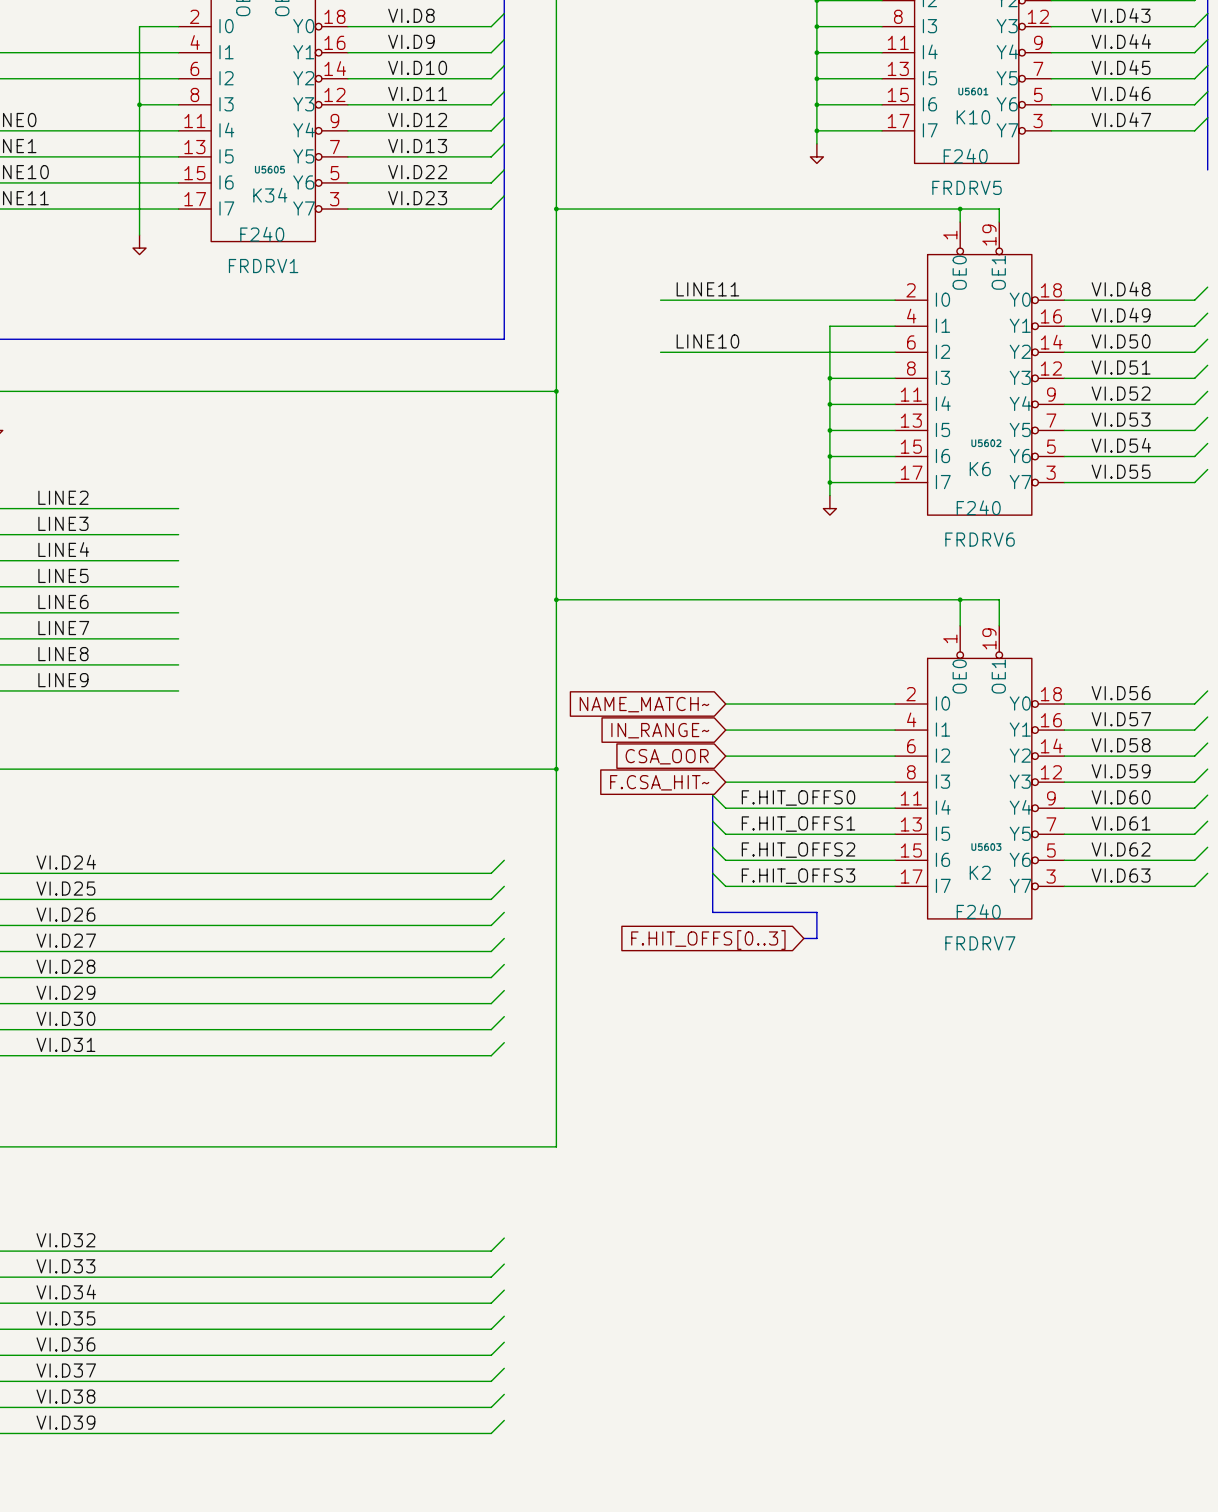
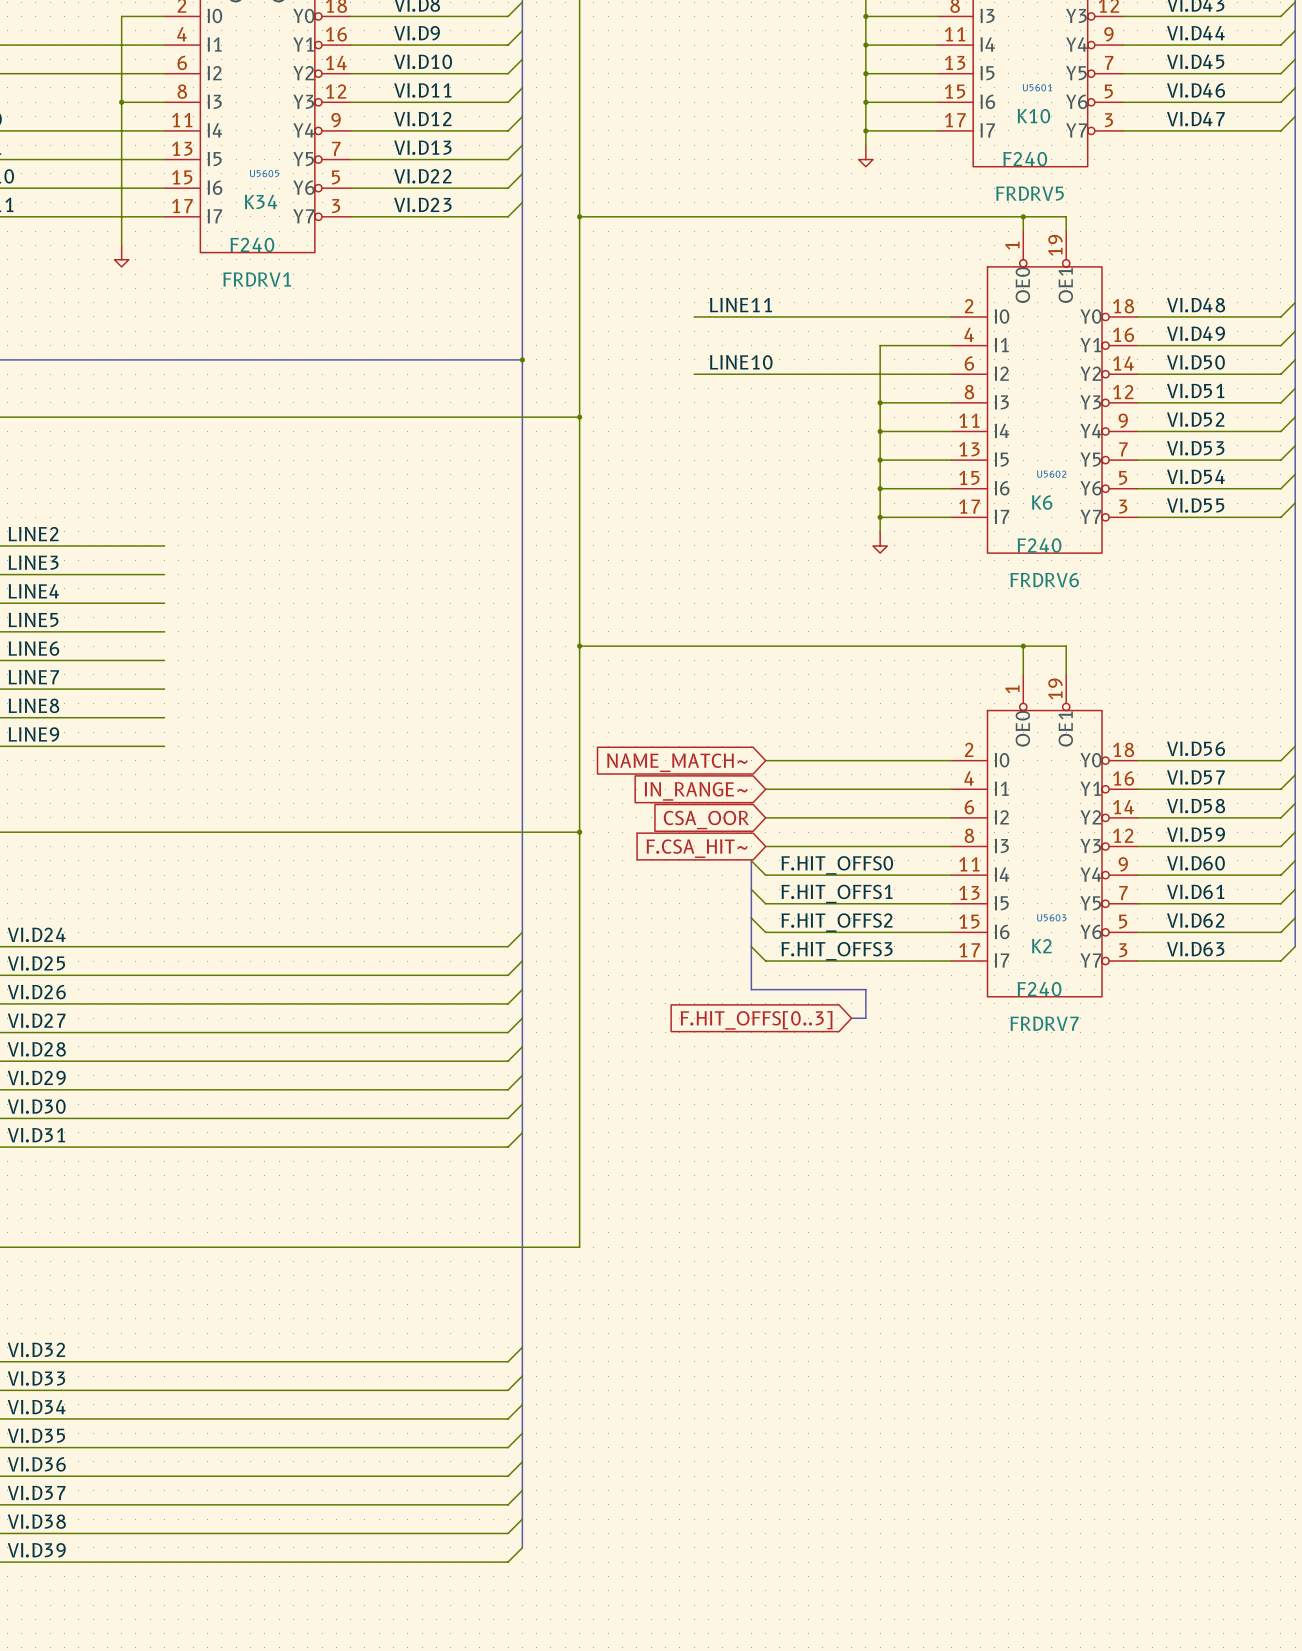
bus: none -> (1295, 173) (1295, 946)
bus: none -> (522, 359) (522, 1547)
junction: none -> (522, 359)

